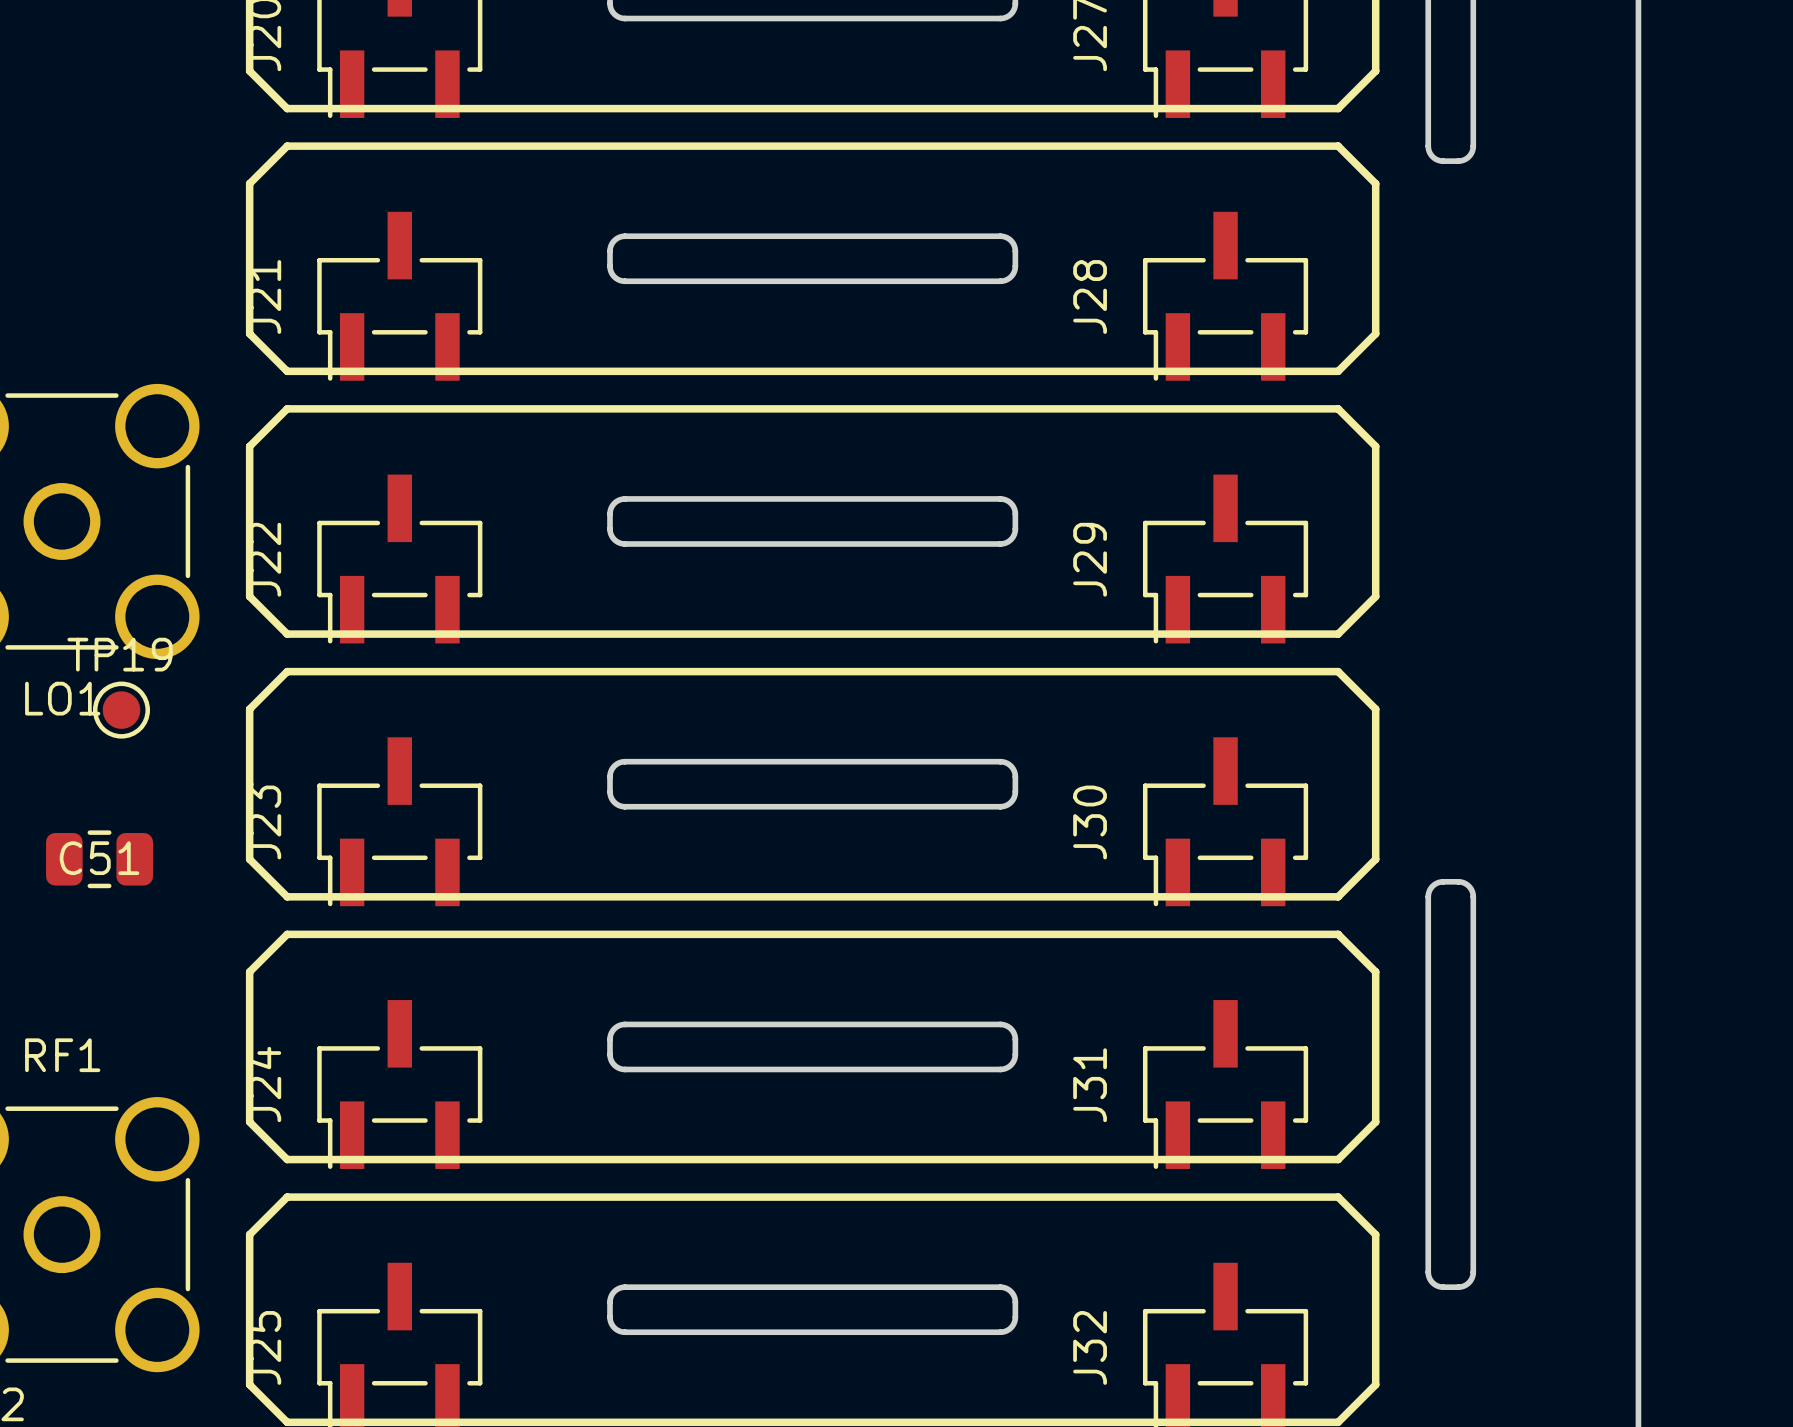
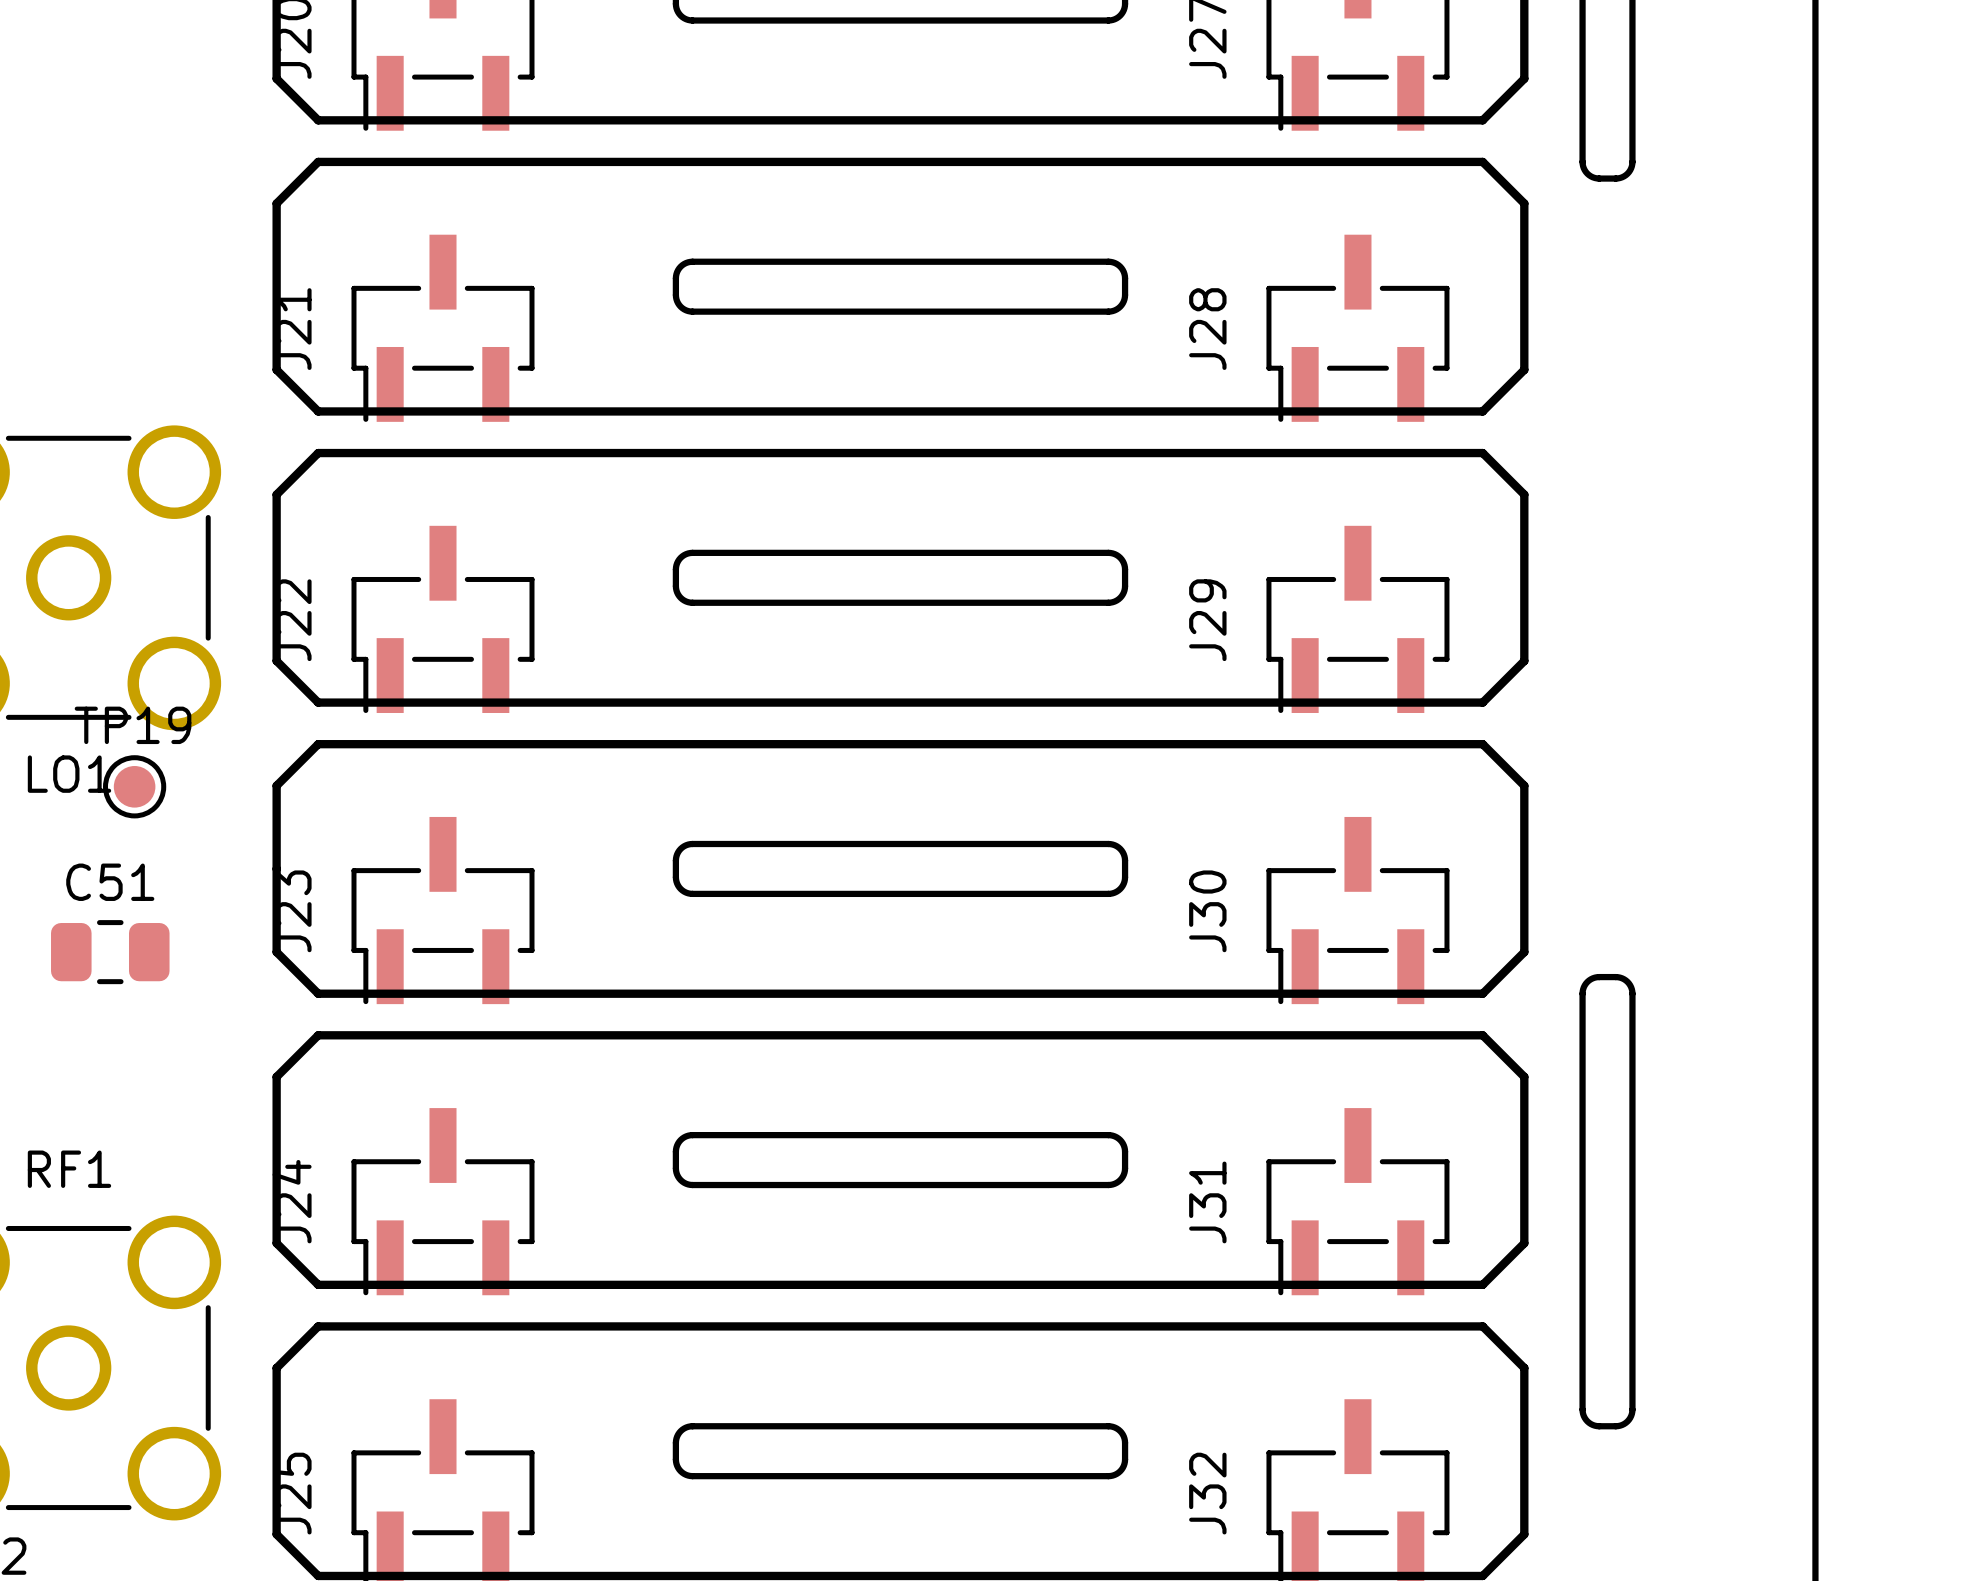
C51 name position: C51 (99, 858) -> C51 (110, 882)

